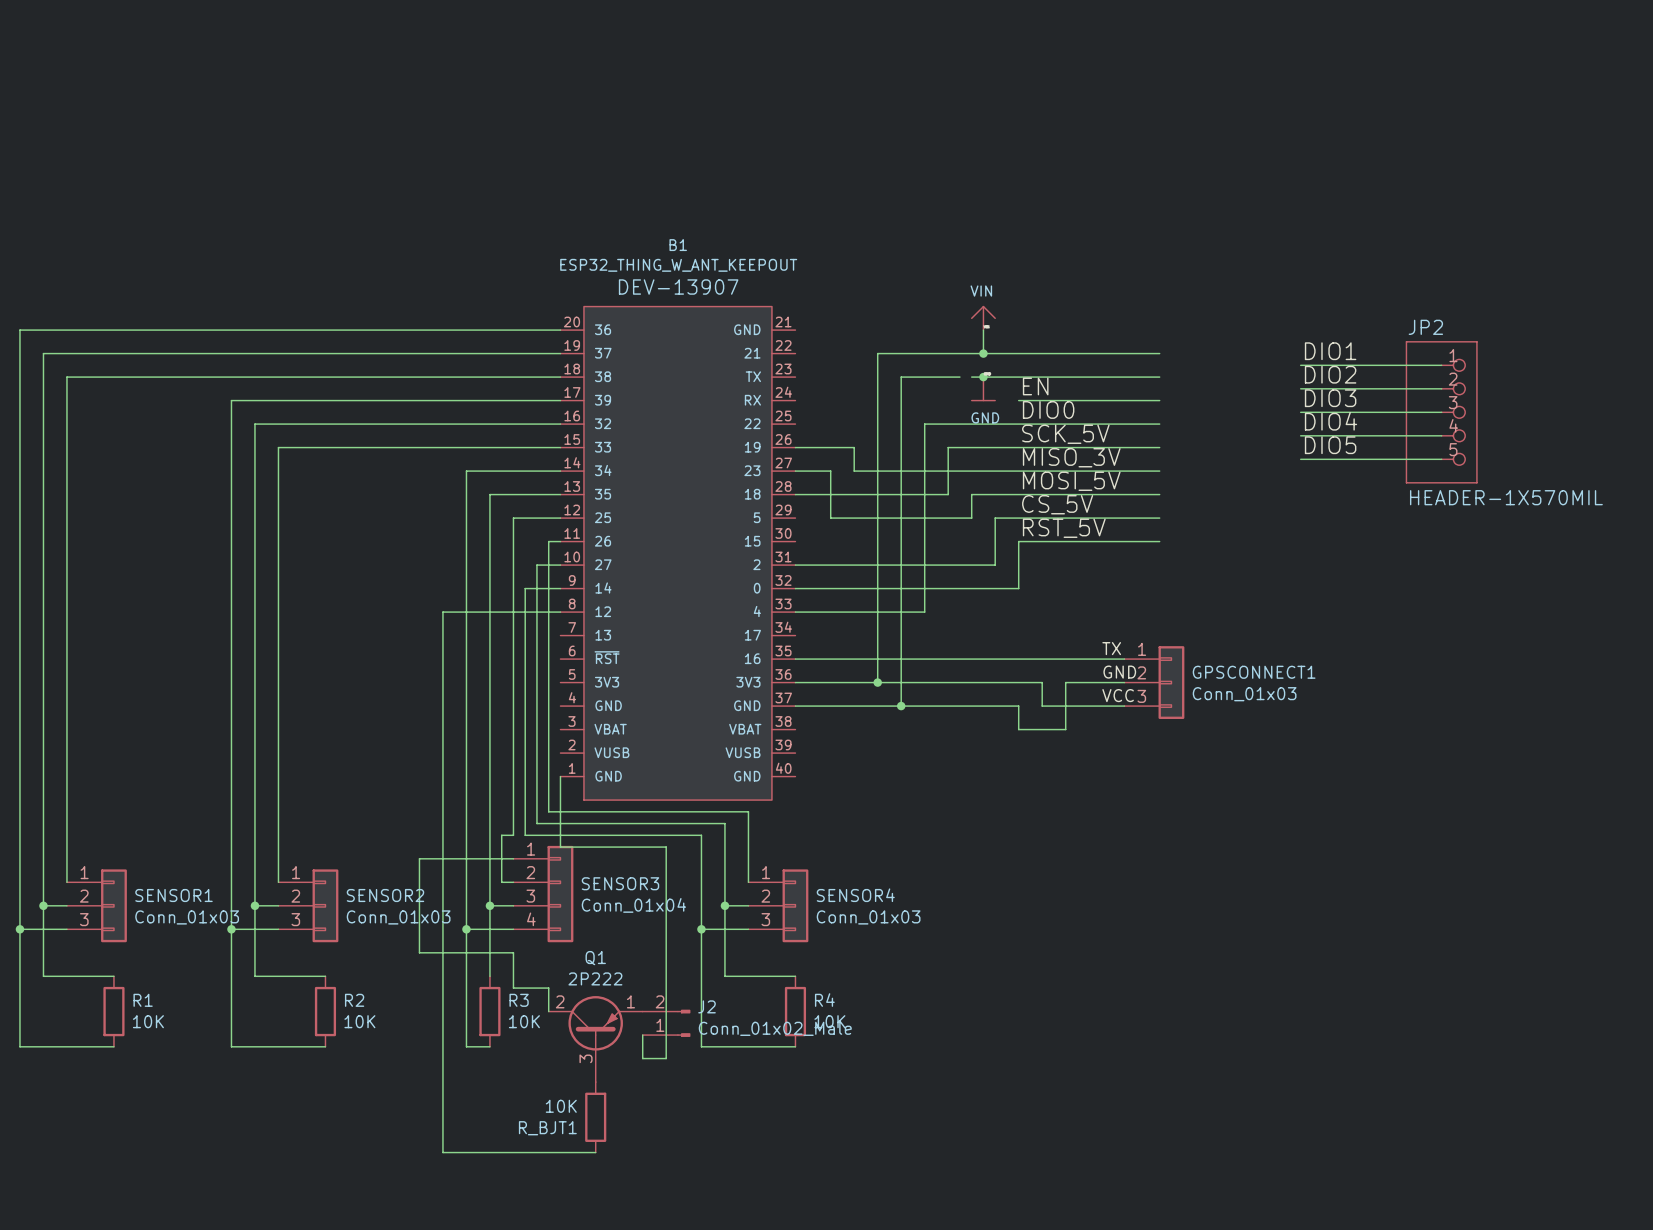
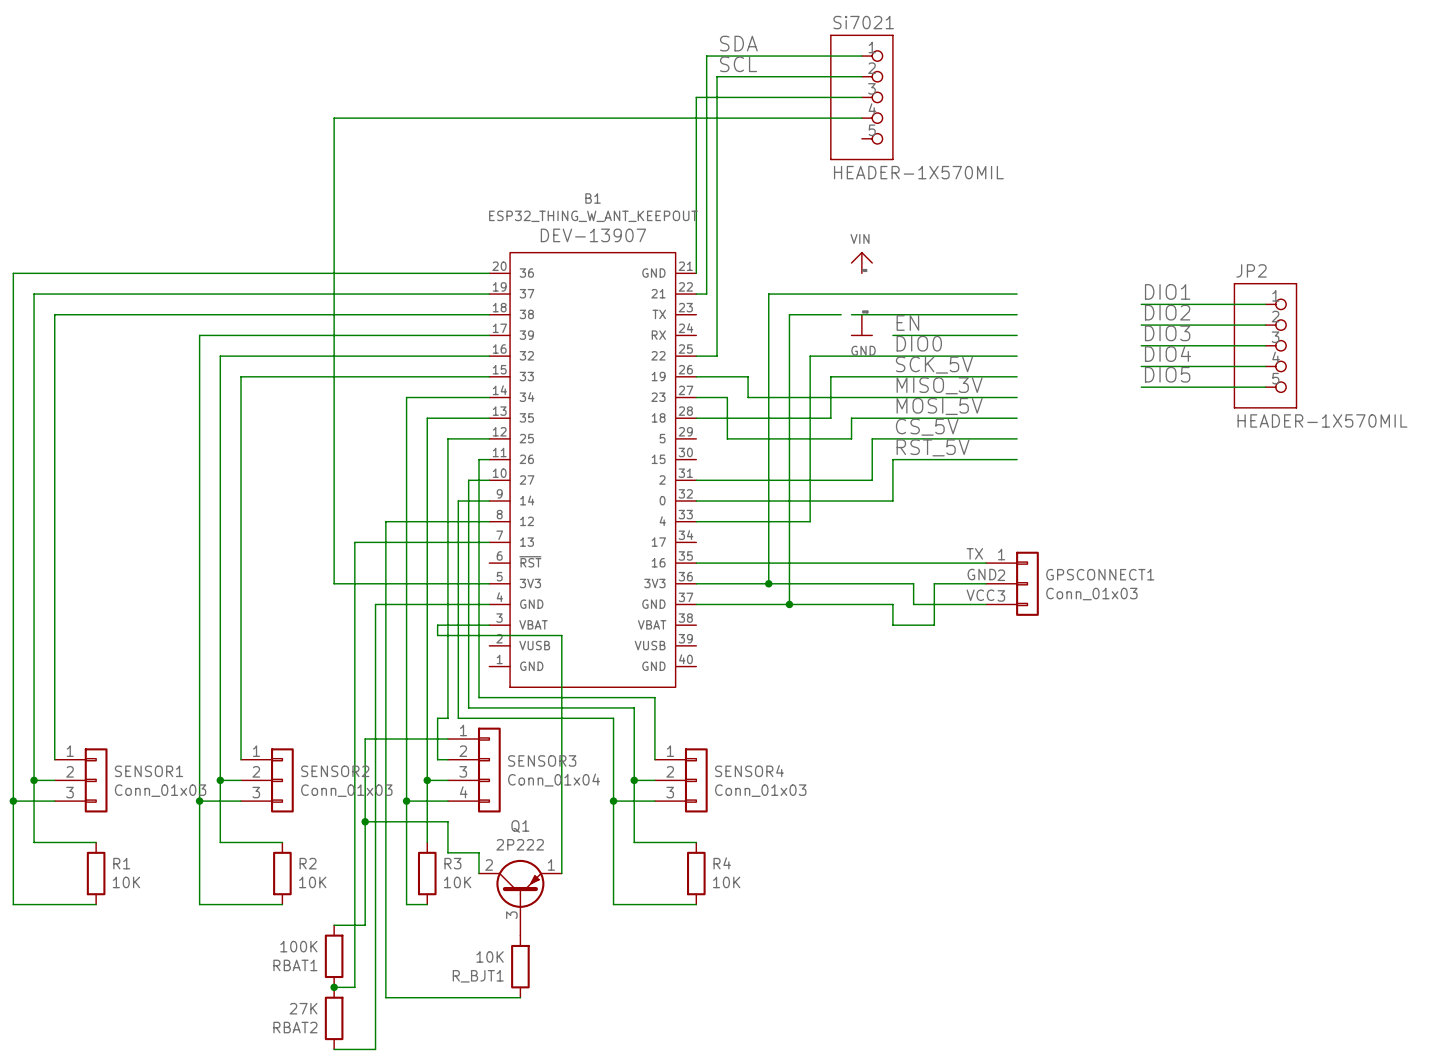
label: none -> SDA (738, 43)
wire: none -> (861, 56) (706, 56) (706, 294) (696, 294)
label: none -> SCL (738, 64)
wire: none -> (861, 76) (717, 76) (717, 356) (696, 356)
wire: none -> (861, 97) (696, 97) (696, 273)
Si7021: none -> HEADER-1X570MIL (861, 97)
wire: none -> (861, 118) (334, 118) (334, 583) (489, 583)
wire: (983, 330) (983, 353) -> none
junction: (983, 353) -> none
junction: (983, 377) -> none
wire: none -> (489, 542) (354, 542) (354, 987) (334, 987)
wire: none -> (489, 604) (375, 604) (375, 1049) (334, 1049)
wire: none -> (489, 625) (437, 625) (437, 635) (561, 635) (561, 873)
wire: (560, 776) (560, 847) (666, 847) (666, 1058) (642, 1058) (642, 1035) -> none
wire: none -> (365, 821) (365, 925) (334, 925)
junction: none -> (365, 821)
J2: Conn_01x02_Male (666, 1023) -> none
RBAT1: none -> 100K (334, 956)
junction: none -> (334, 987)
RBAT2: none -> 27K (334, 1018)

